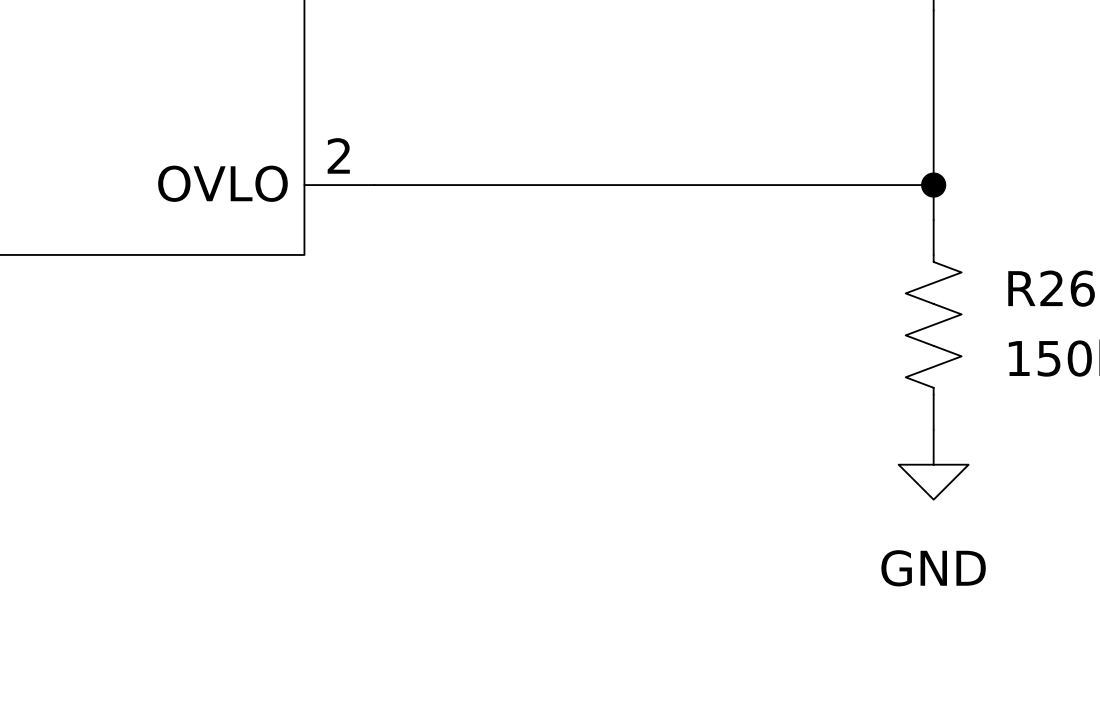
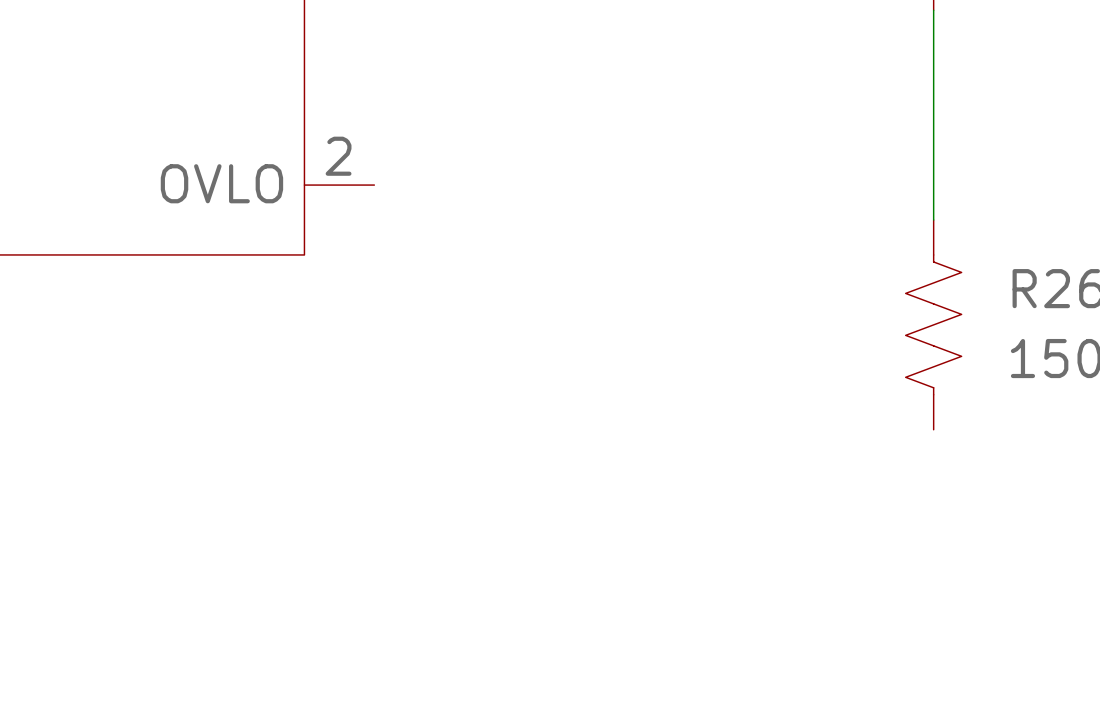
wire: (374, 185) (933, 185) -> none
junction: (933, 185) -> none
power symbol: GND (933, 464) -> none

